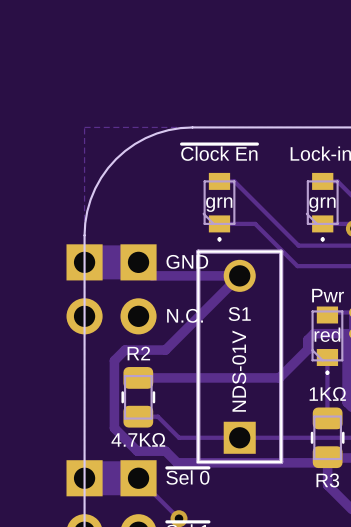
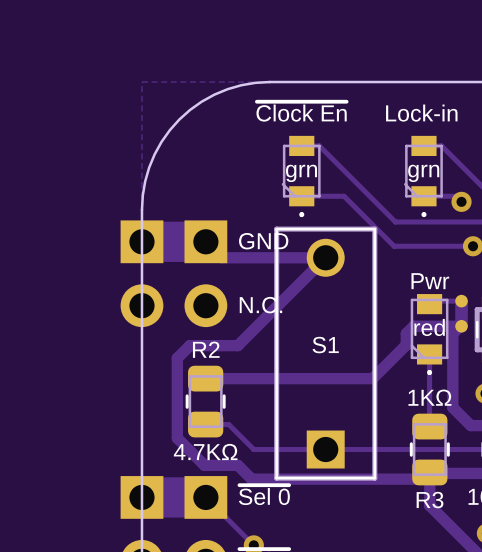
S1 name position: S1 (239, 314) -> S1 (325, 345)
S1 value: NDS-01V (239, 371) -> none

